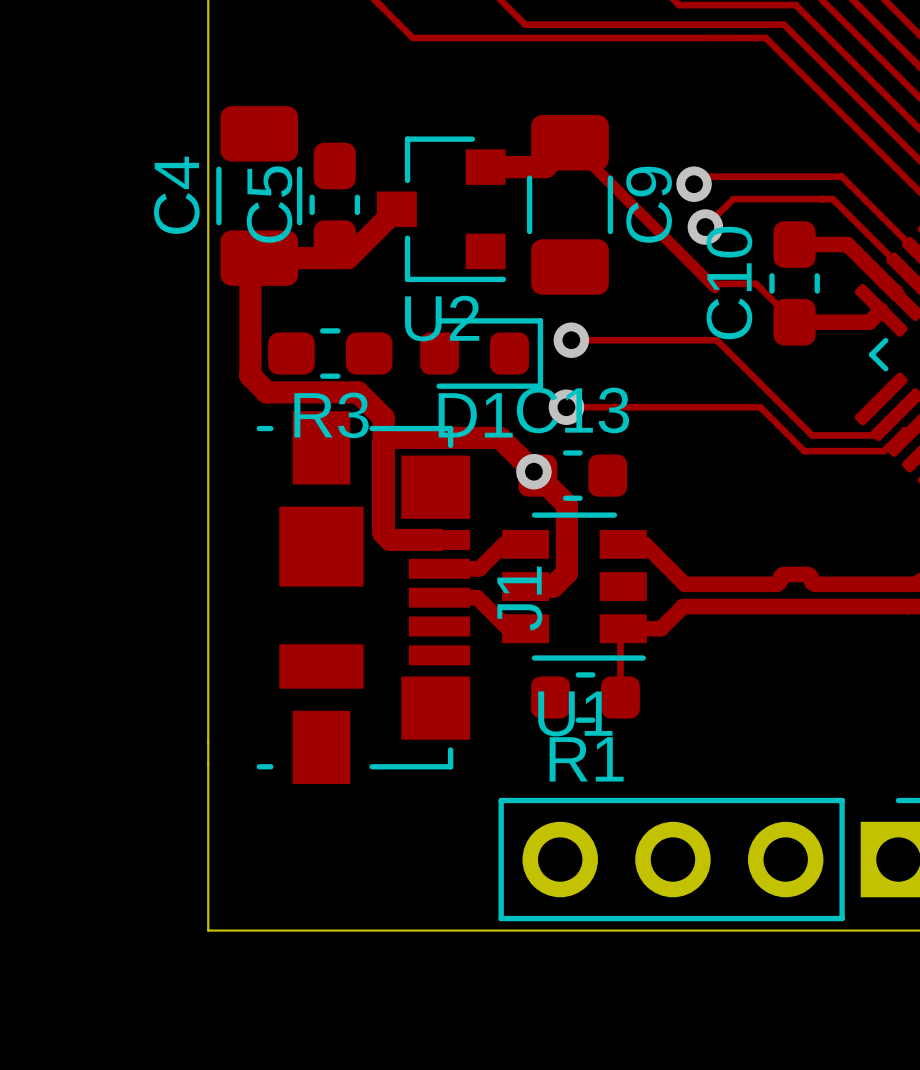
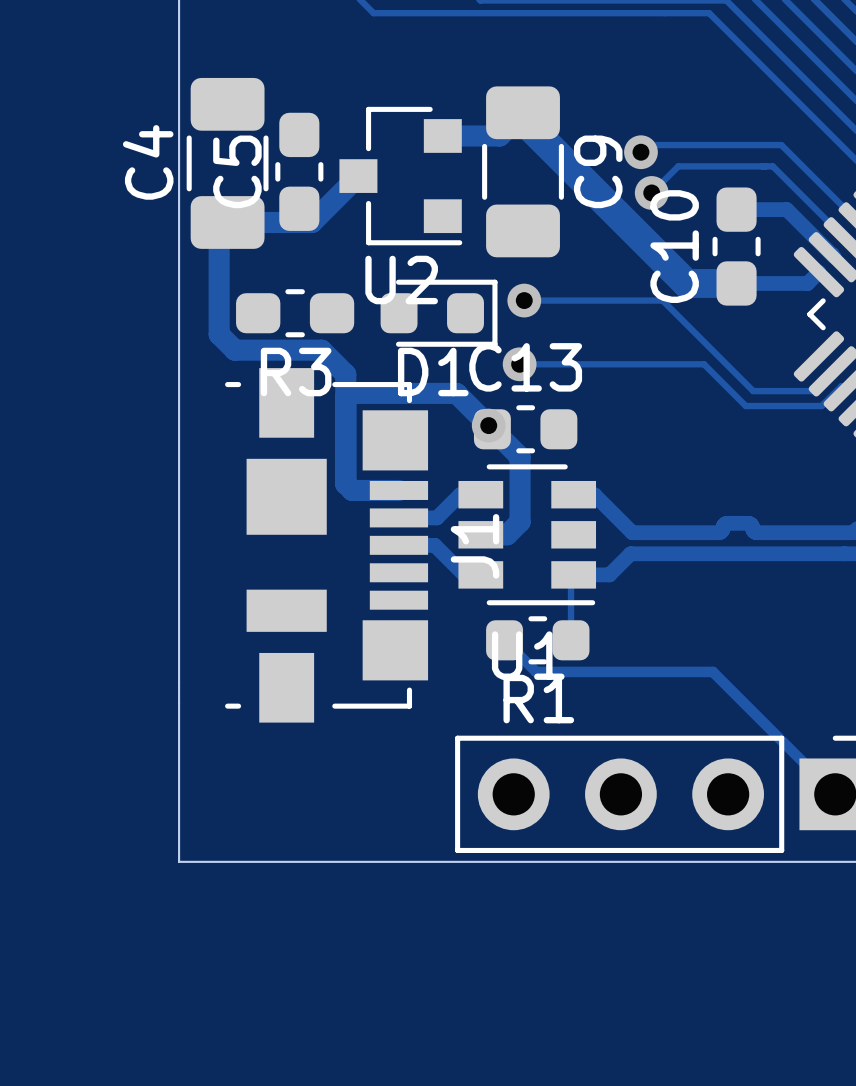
track: (570, 142) (711, 283) (756, 283) (794, 322) -> (523, 112) (523, 120) (686, 283) (736, 283)
track: none -> (504, 640) (536, 671) (712, 671) (835, 794)

